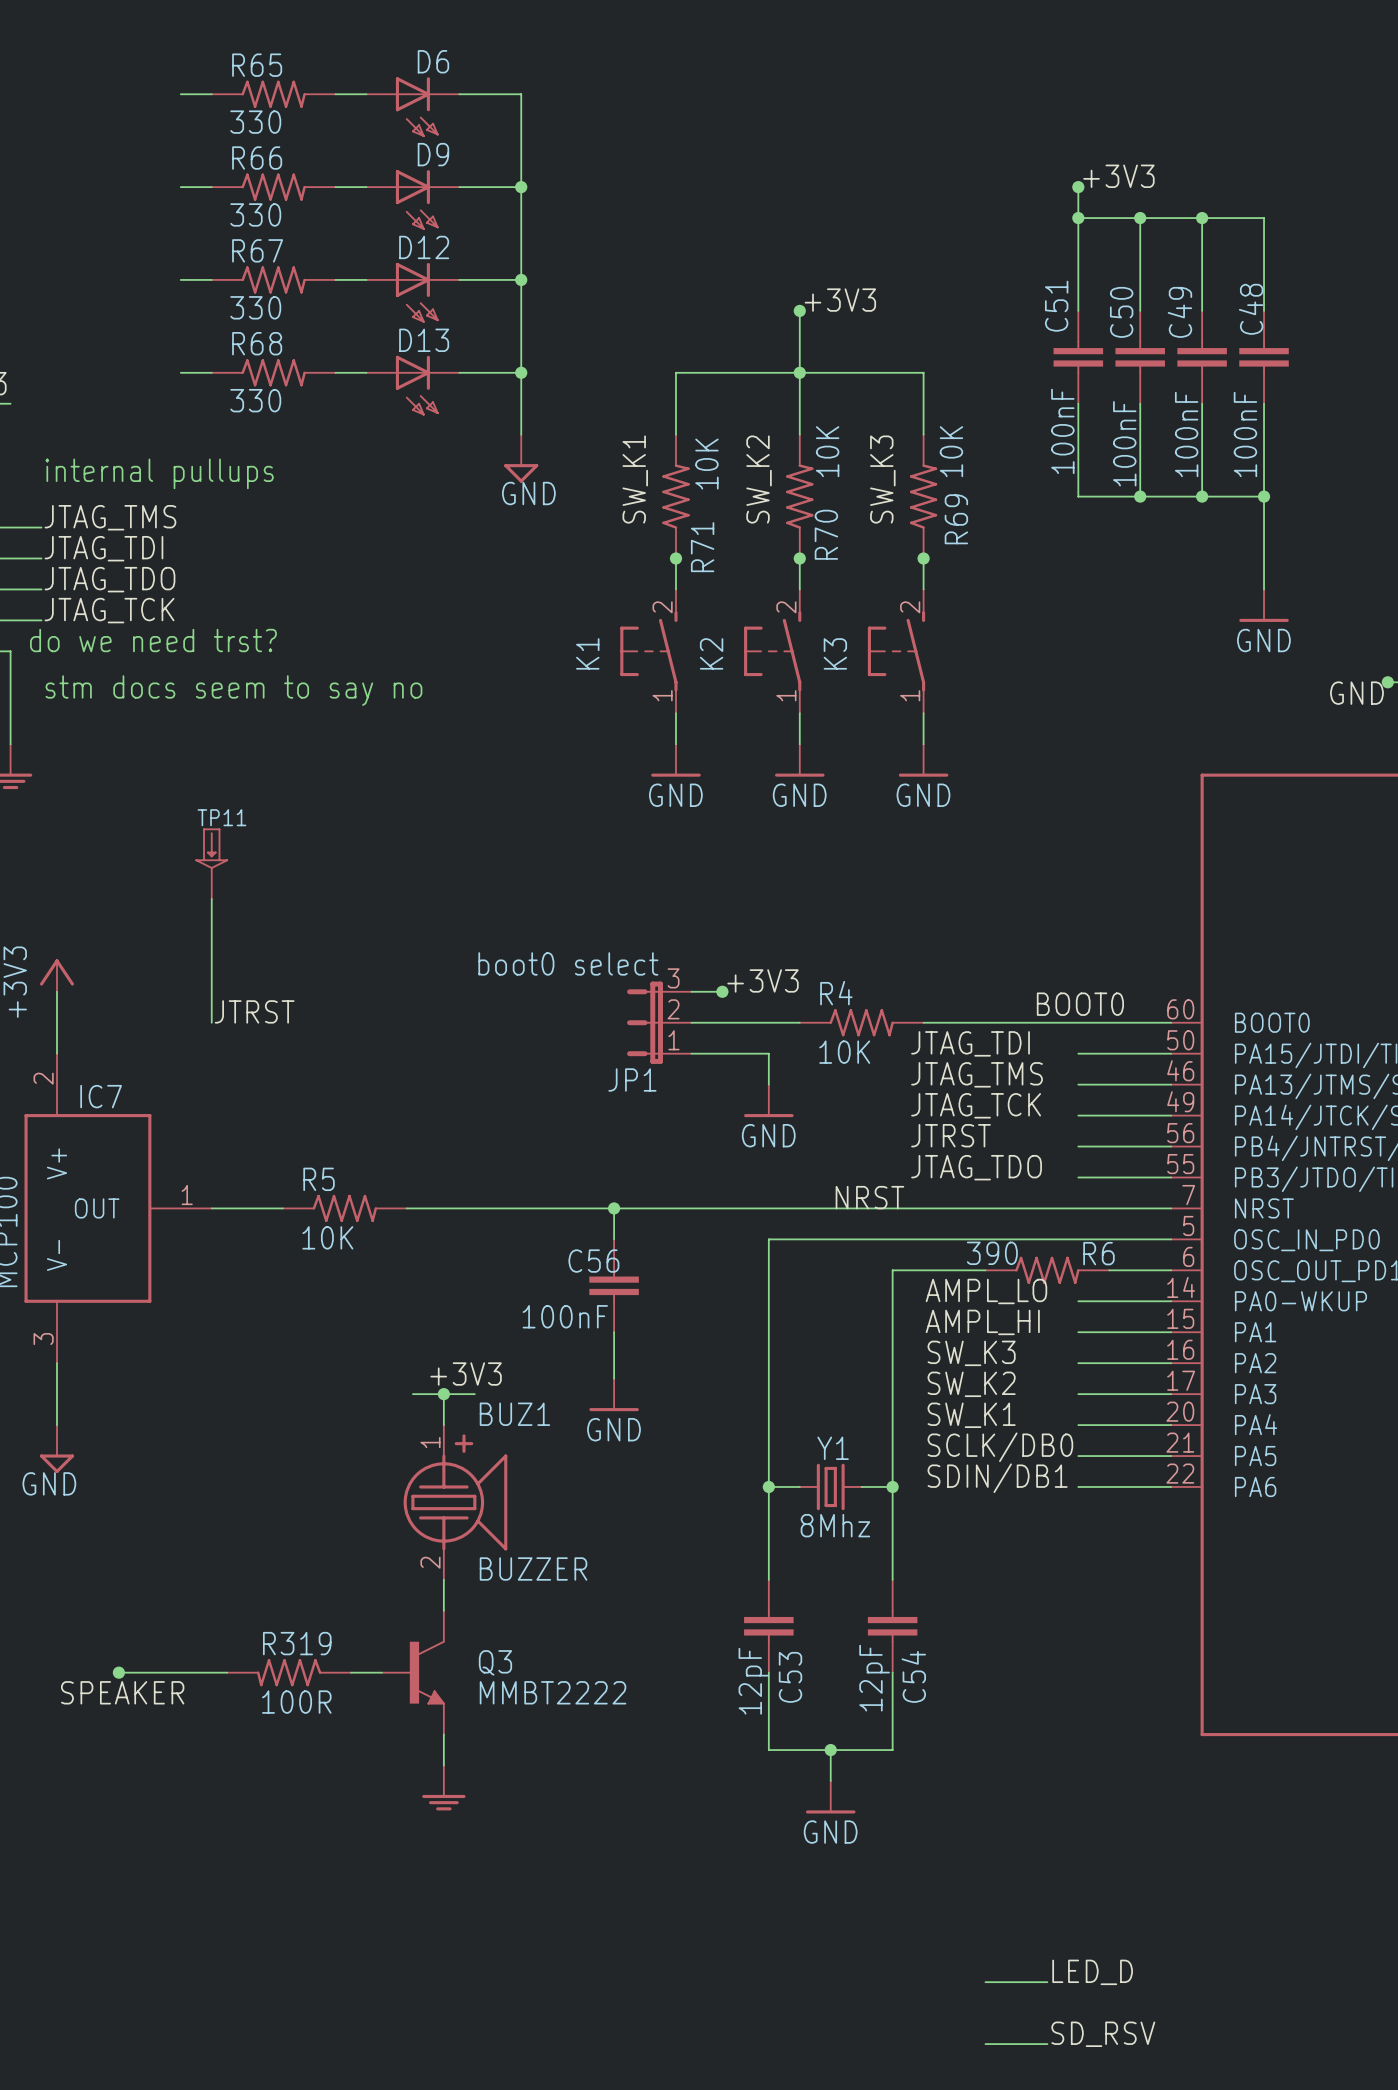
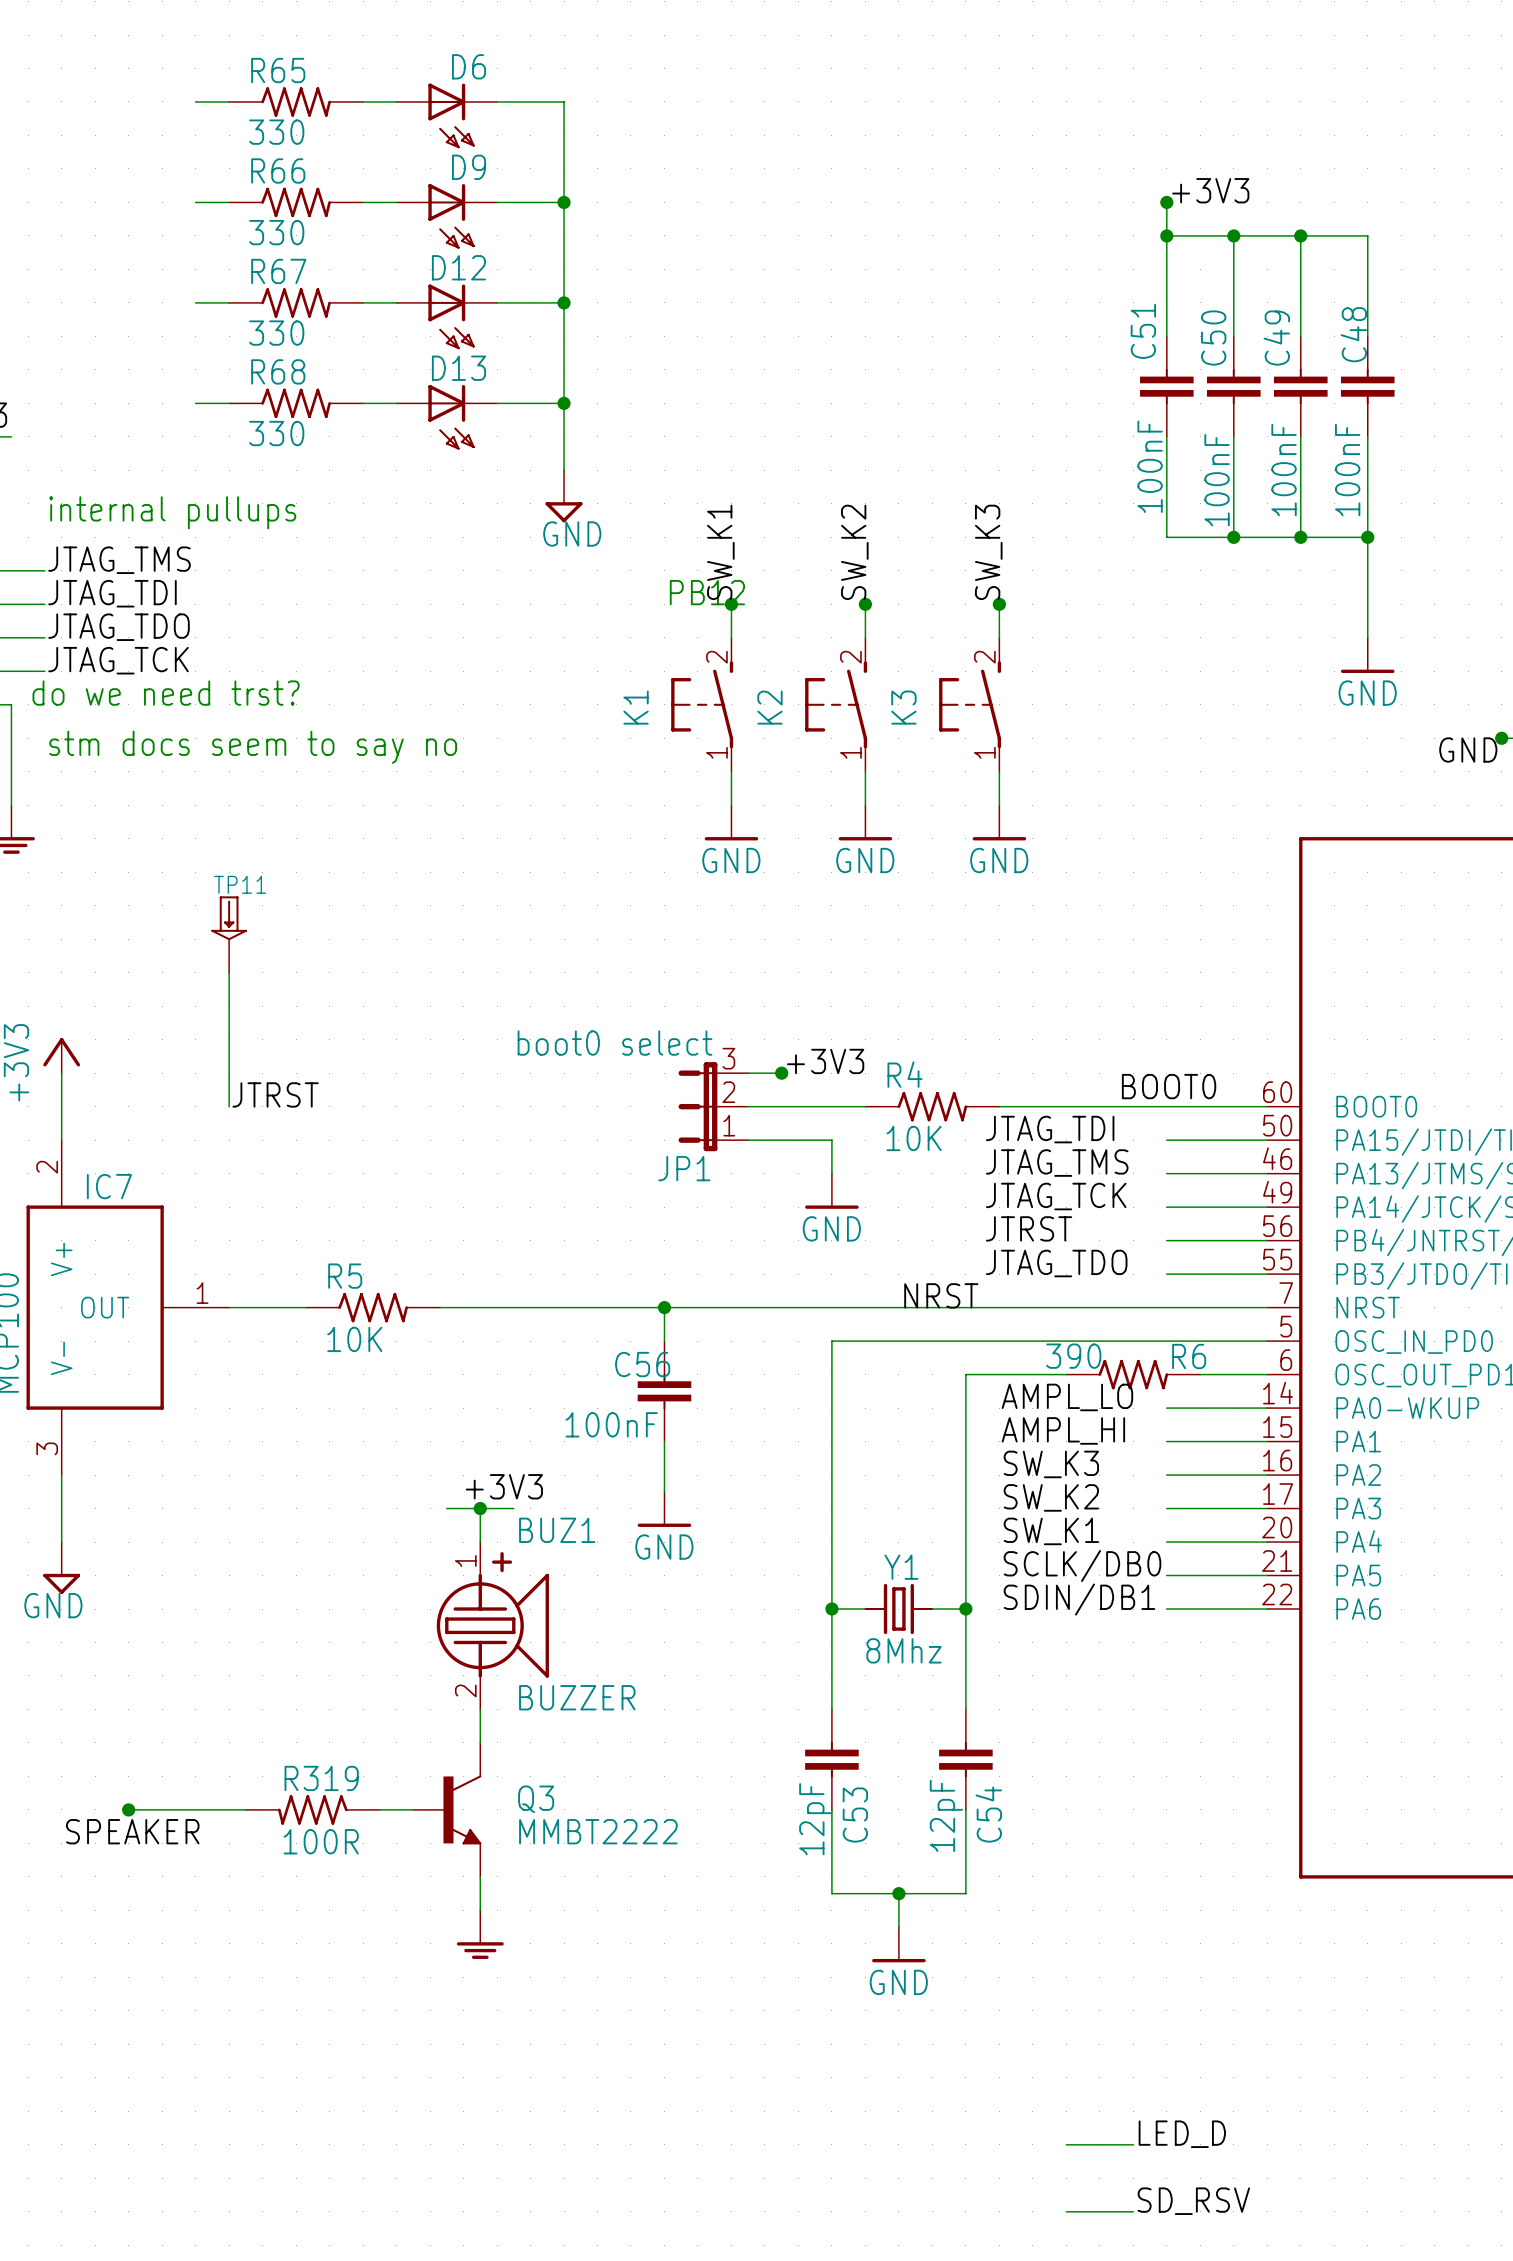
label: +3V3 (840, 300) -> none
wire: (799, 310) (799, 434) -> none
junction: (799, 310) -> none
junction: (799, 372) -> none
wire: (675, 434) (675, 372) (923, 372) (923, 434) -> none
label position: SW_K1 (635, 479) -> SW_K1 (720, 552)
label position: SW_K2 (759, 479) -> SW_K2 (854, 552)
label position: SW_K3 (882, 479) -> SW_K3 (988, 552)
R71: 10K (675, 496) -> none
R70: 10K (799, 496) -> none
R69: 10K (923, 496) -> none
text: none -> PB12 (707, 592)

